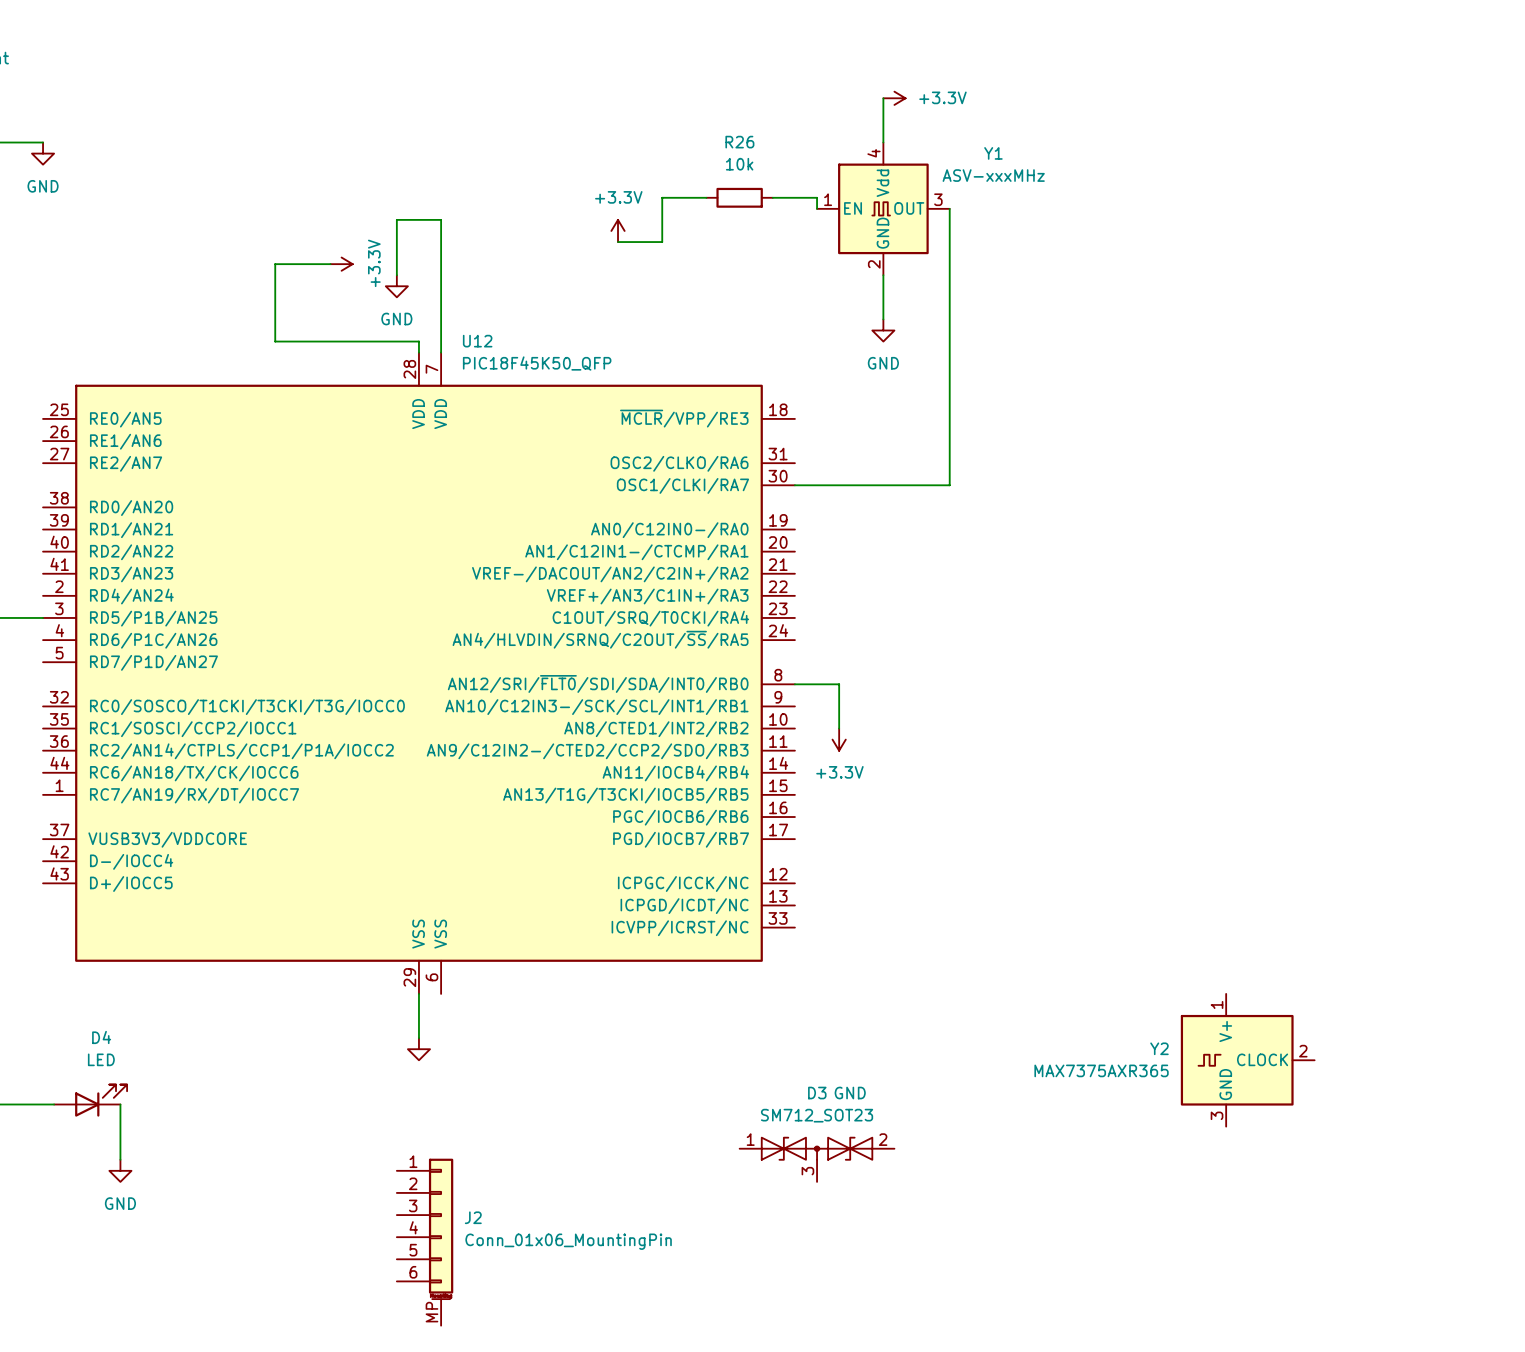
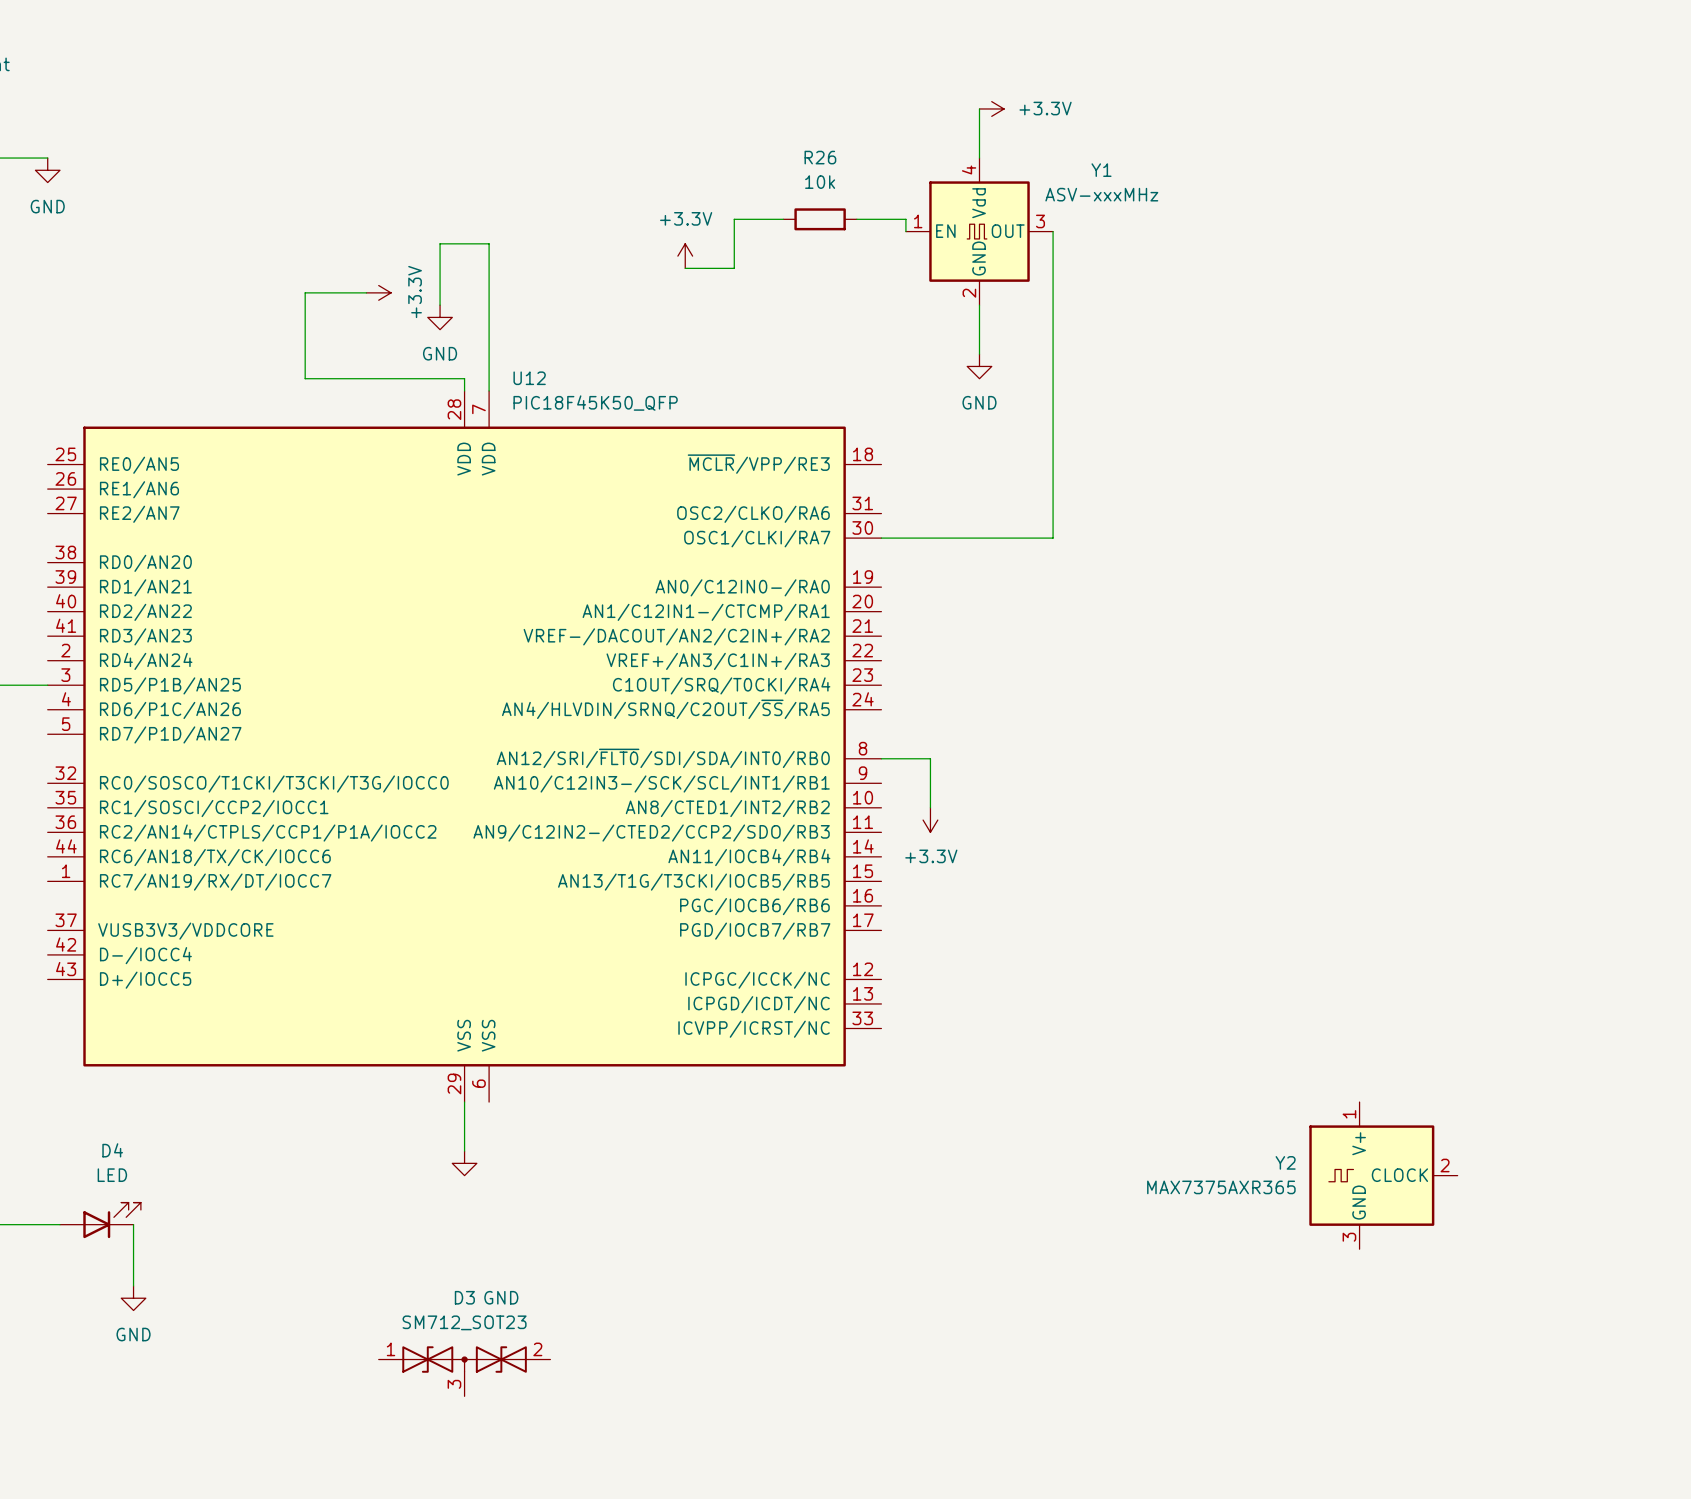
power symbol text position: GND (850, 1093) -> GND (501, 1297)
D3 position: (817, 1159) -> (464, 1371)
J2: Conn_01x06_MountingPin (425, 1242) -> none

